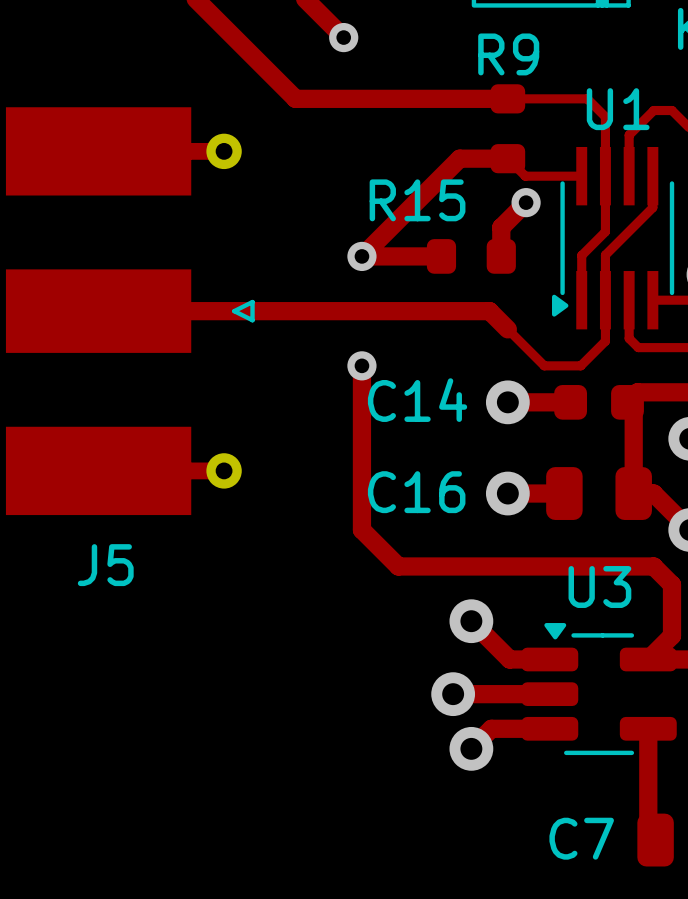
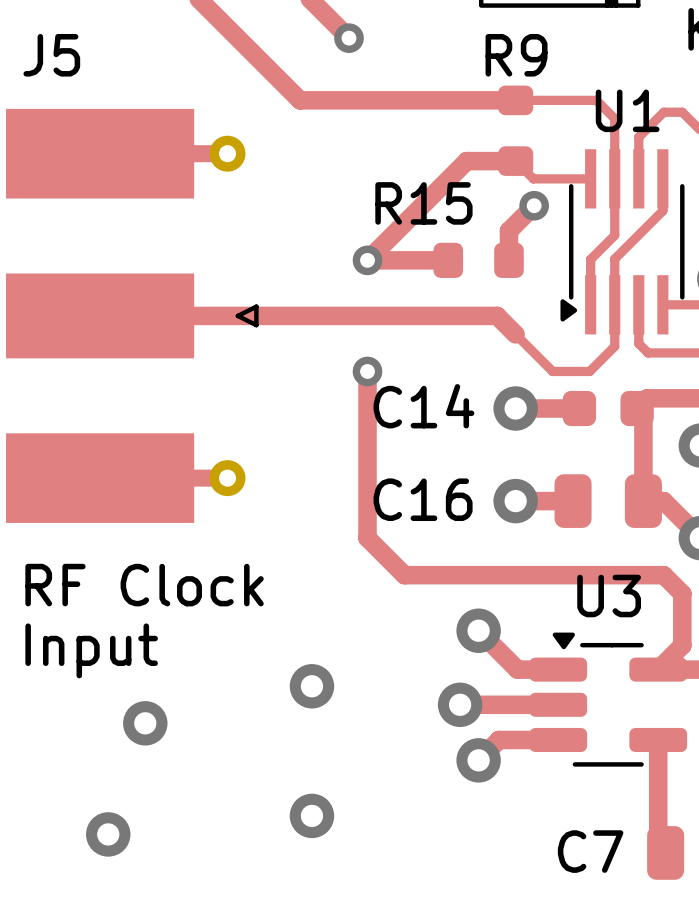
J5 name position: J5 (105, 565) -> J5 (51, 55)
text: none -> RF Clock (144, 585)
text: none -> Input (91, 650)
via: none -> (311, 686)
via: none -> (145, 723)
via: none -> (311, 815)
via: none -> (108, 834)

